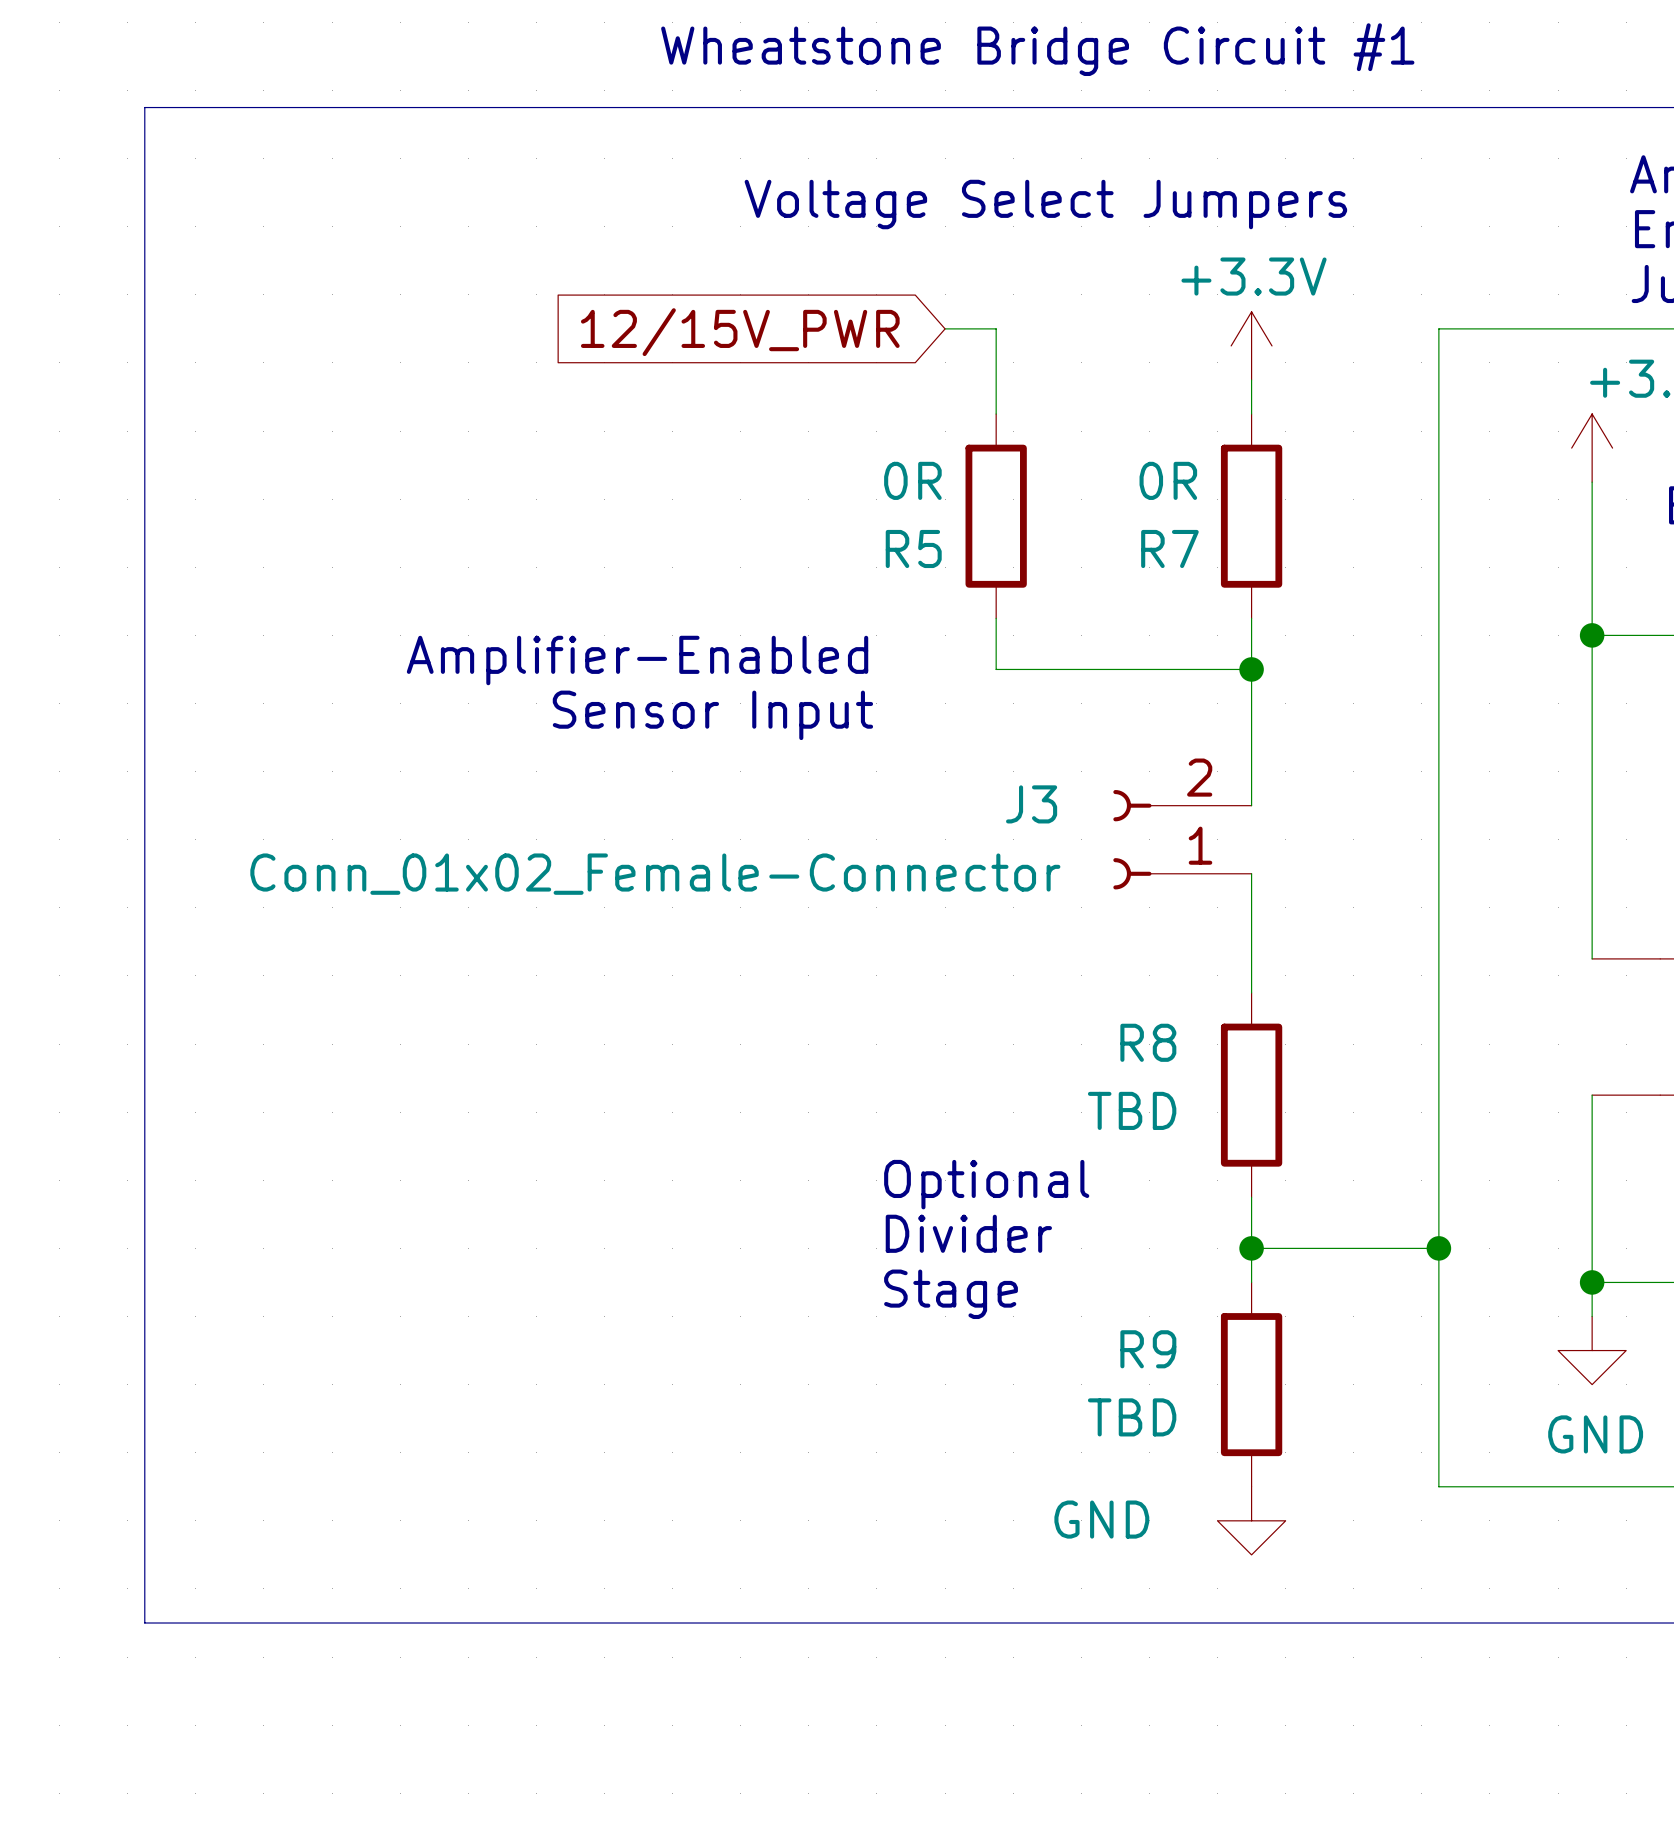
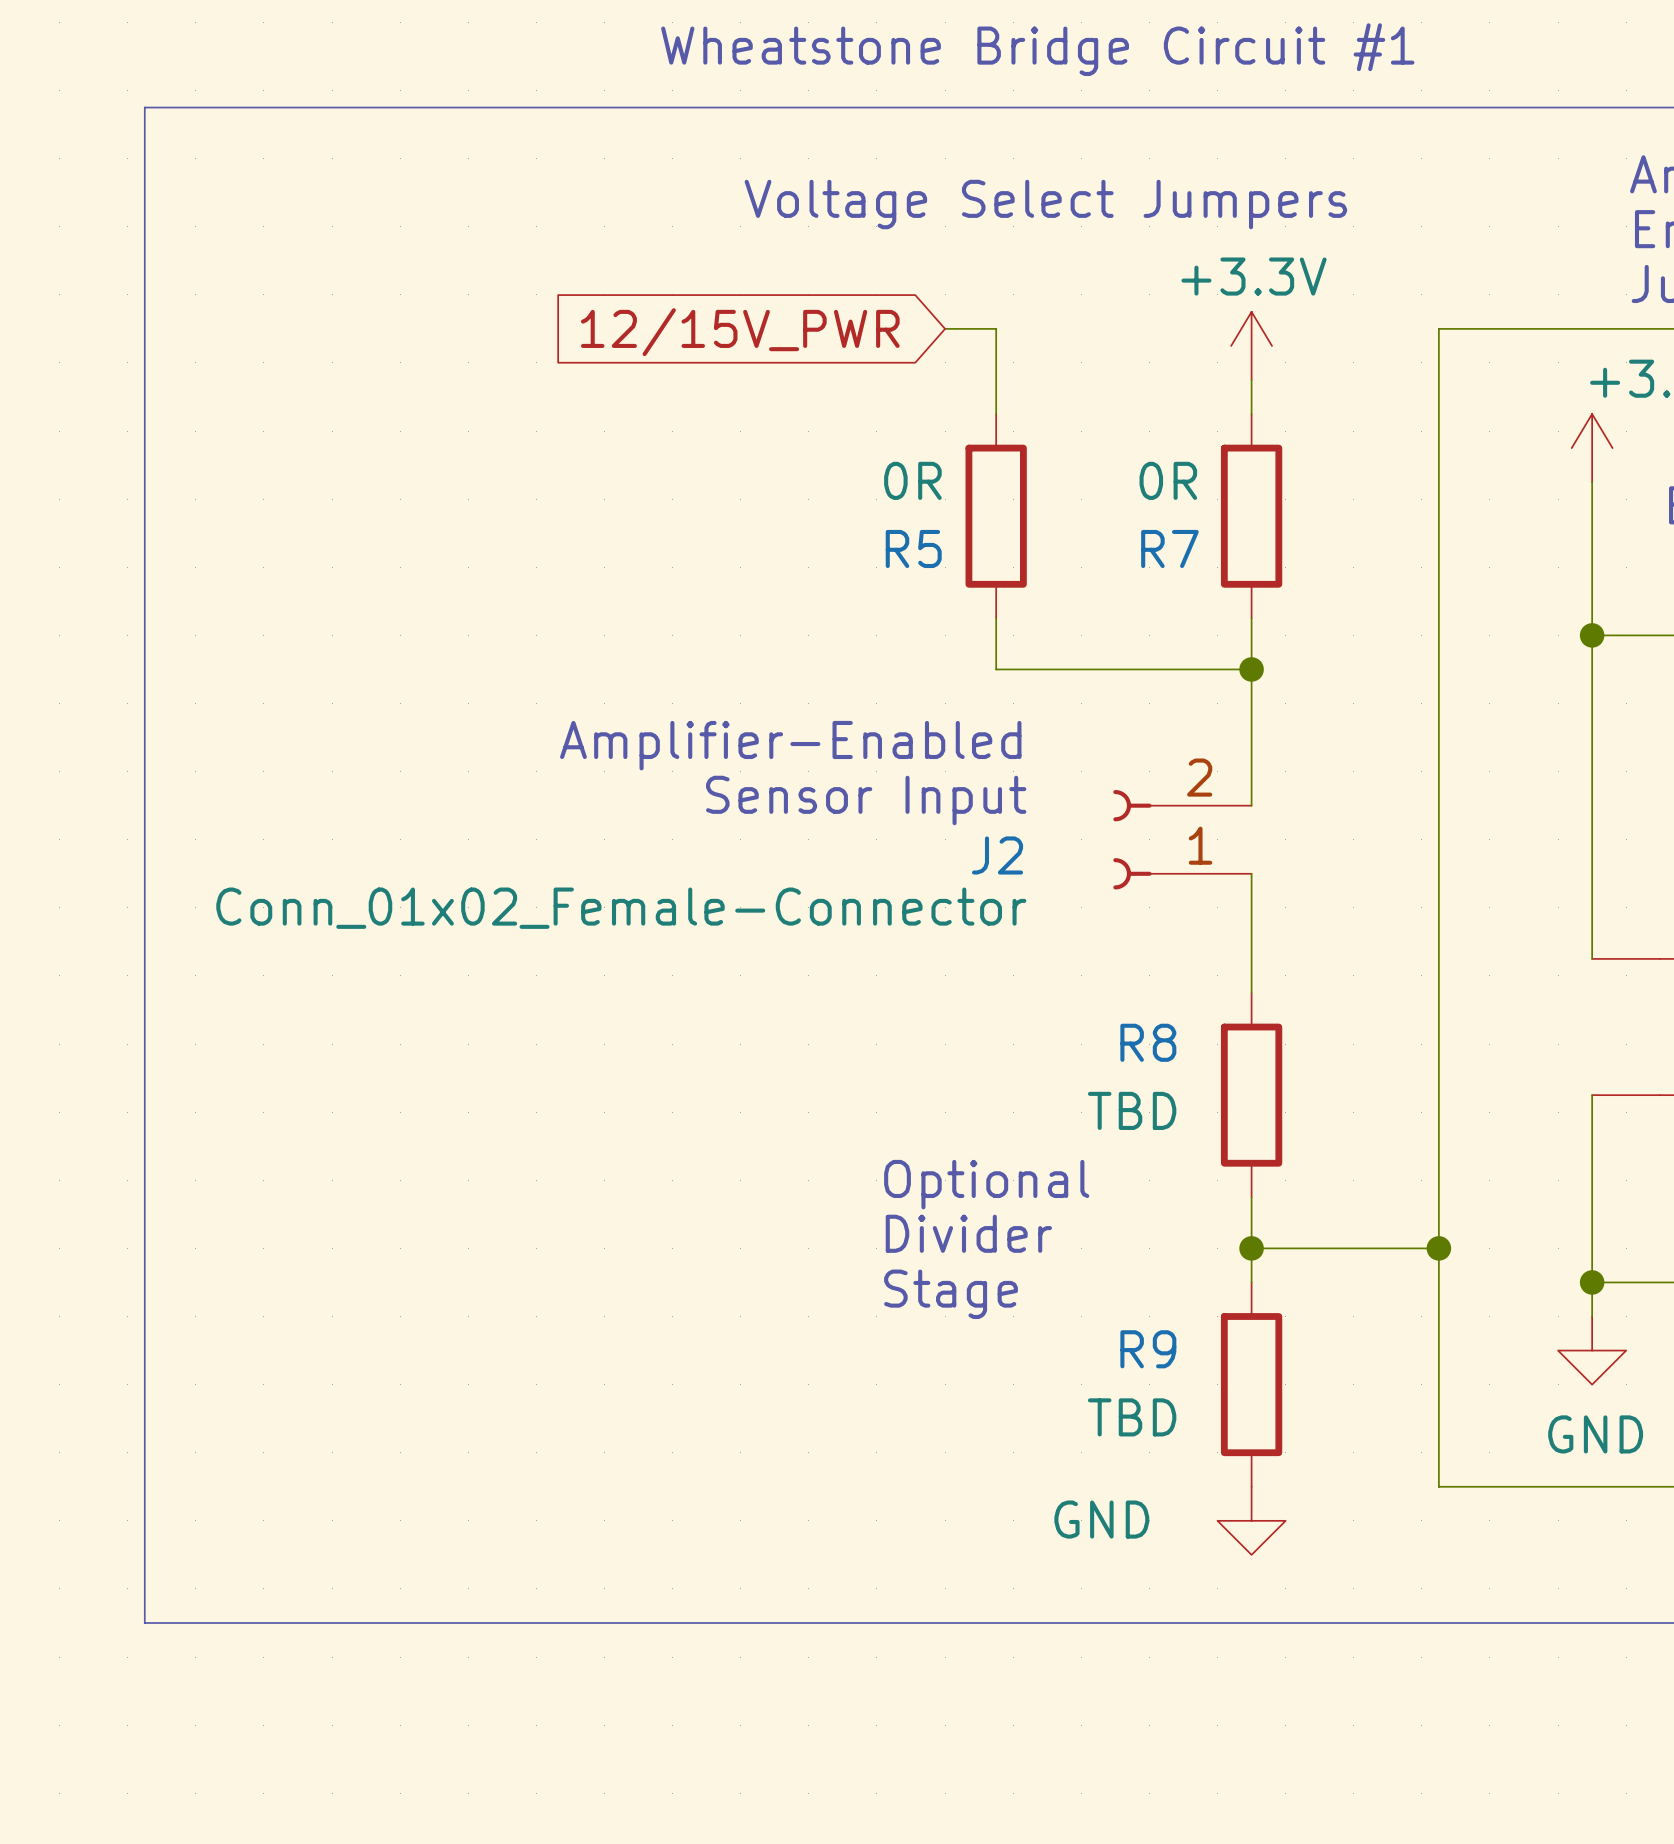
text position: Amplifier-Enabled (637, 660) -> Amplifier-Enabled (790, 745)
text position: Sensor Input (712, 715) -> Sensor Input (866, 800)
J3 name: J3 (1031, 804) -> J2 (997, 855)
J3 value position: Conn_01x02_Female-Connector (655, 874) -> Conn_01x02_Female-Connector (621, 908)

